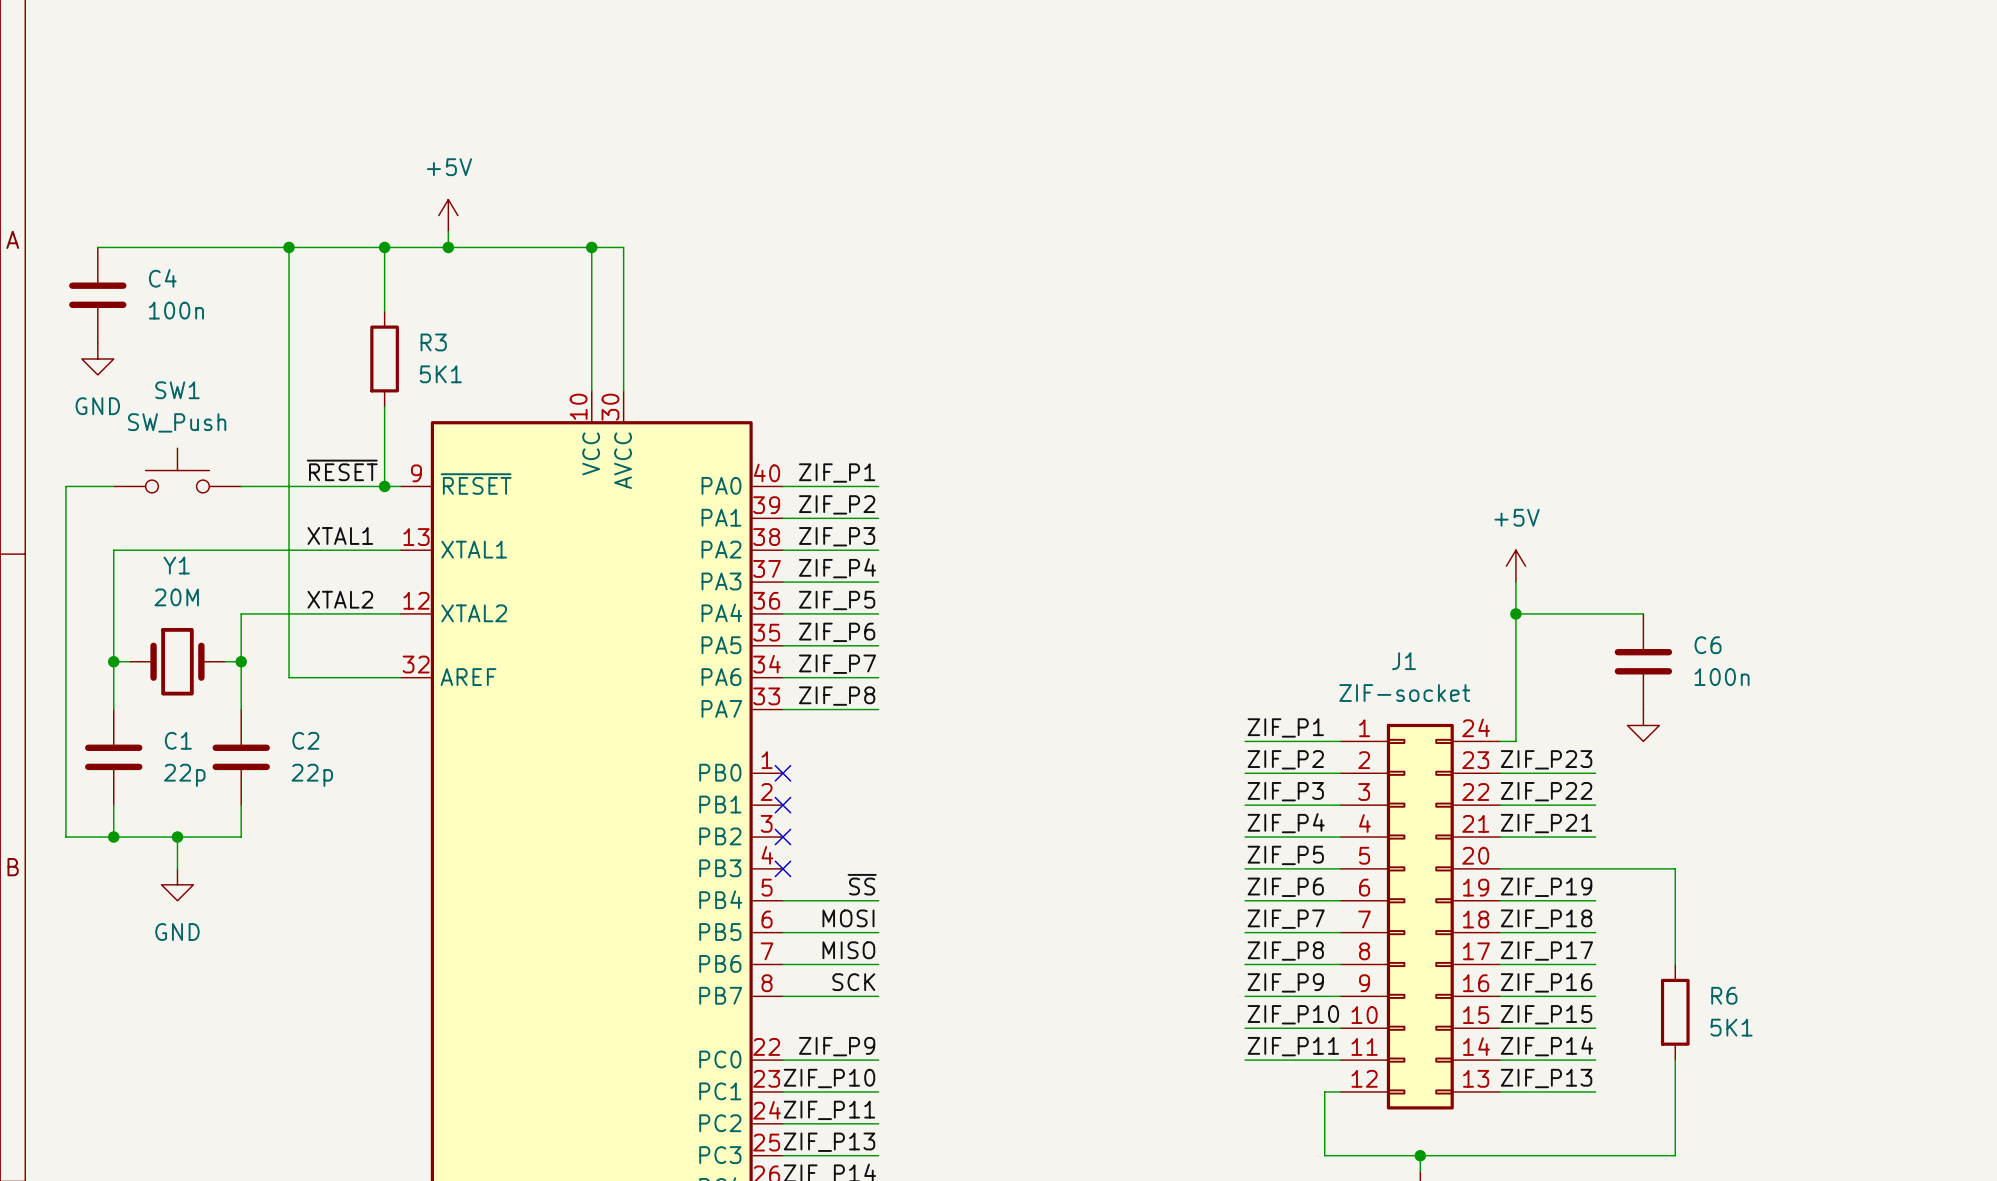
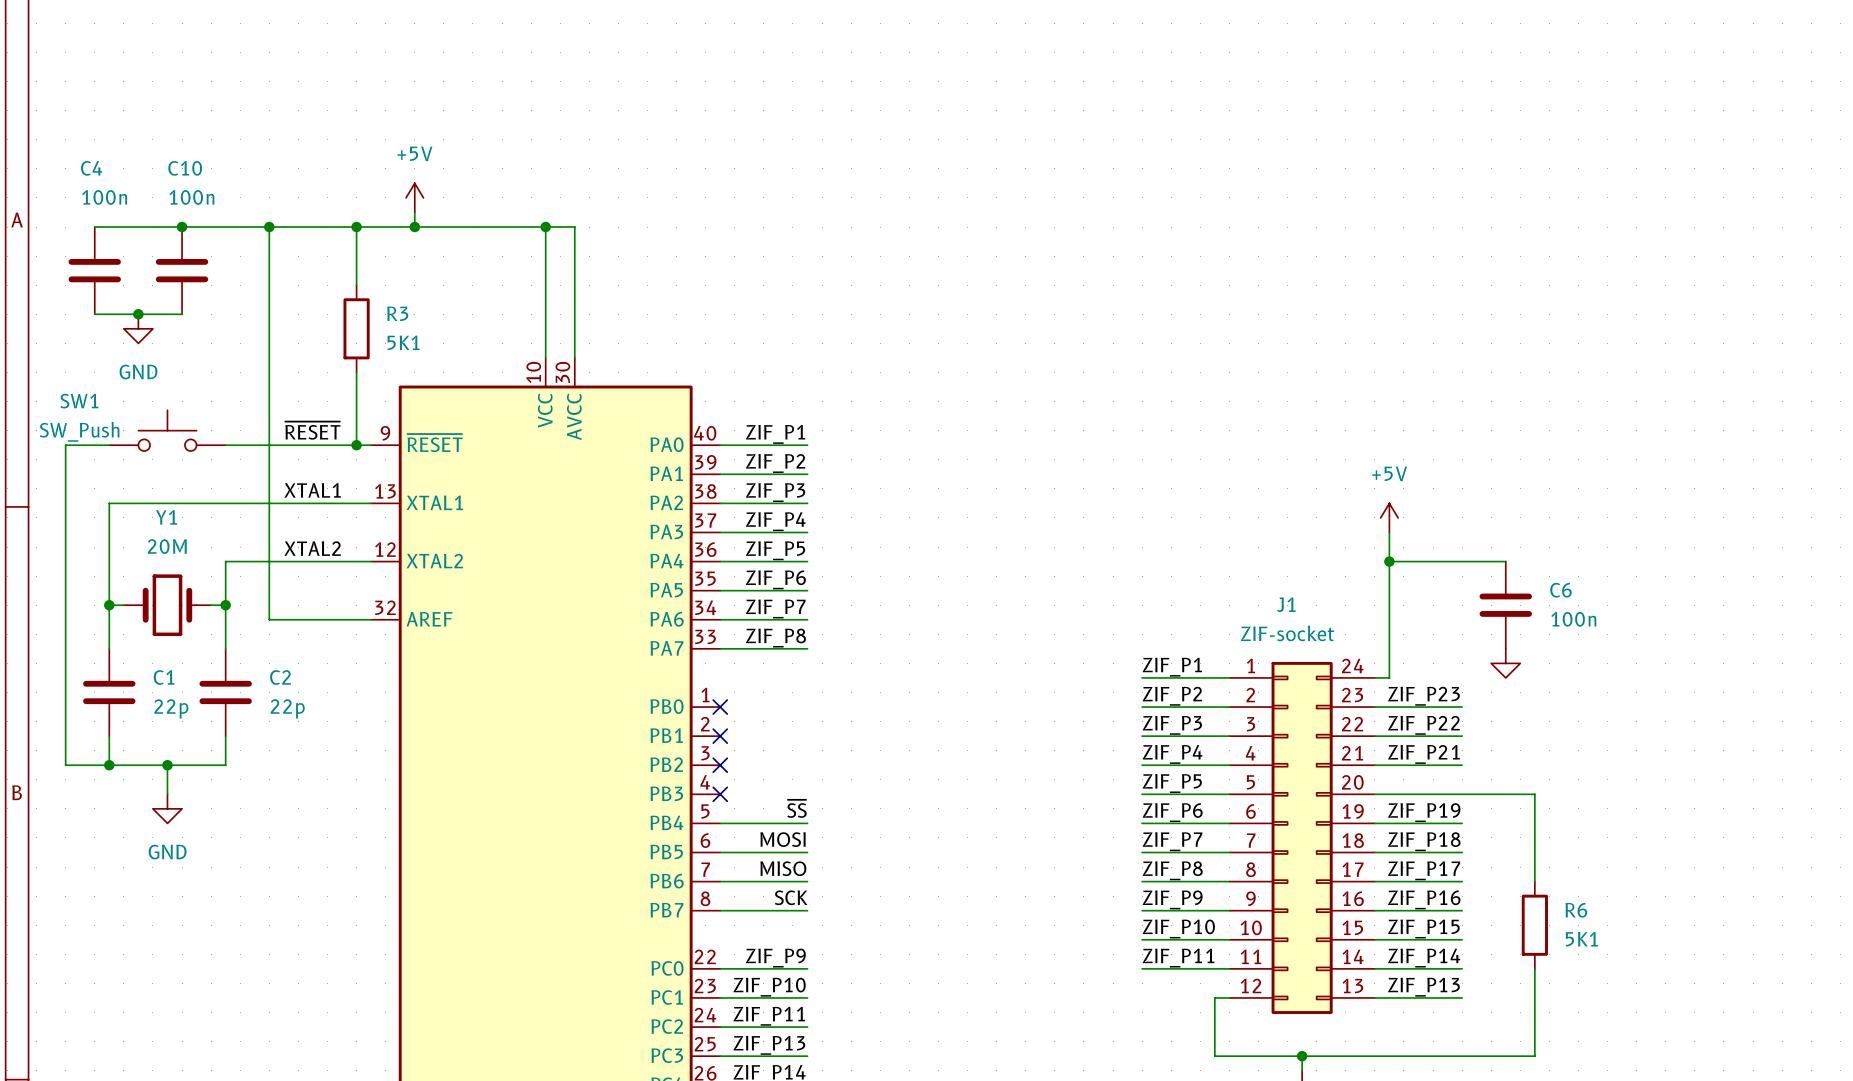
junction: none -> (182, 227)
C4 name position: C4 (162, 278) -> C4 (91, 168)
C10: none -> 100n (182, 270)
C4 value position: 100n (176, 310) -> 100n (104, 197)
wire: none -> (94, 314) (182, 314)
junction: none -> (138, 314)
power symbol position: GND (97, 358) -> GND (138, 328)
SW1 name position: SW1 (177, 390) -> SW1 (79, 401)
SW1 value position: SW_Push (177, 422) -> SW_Push (79, 431)

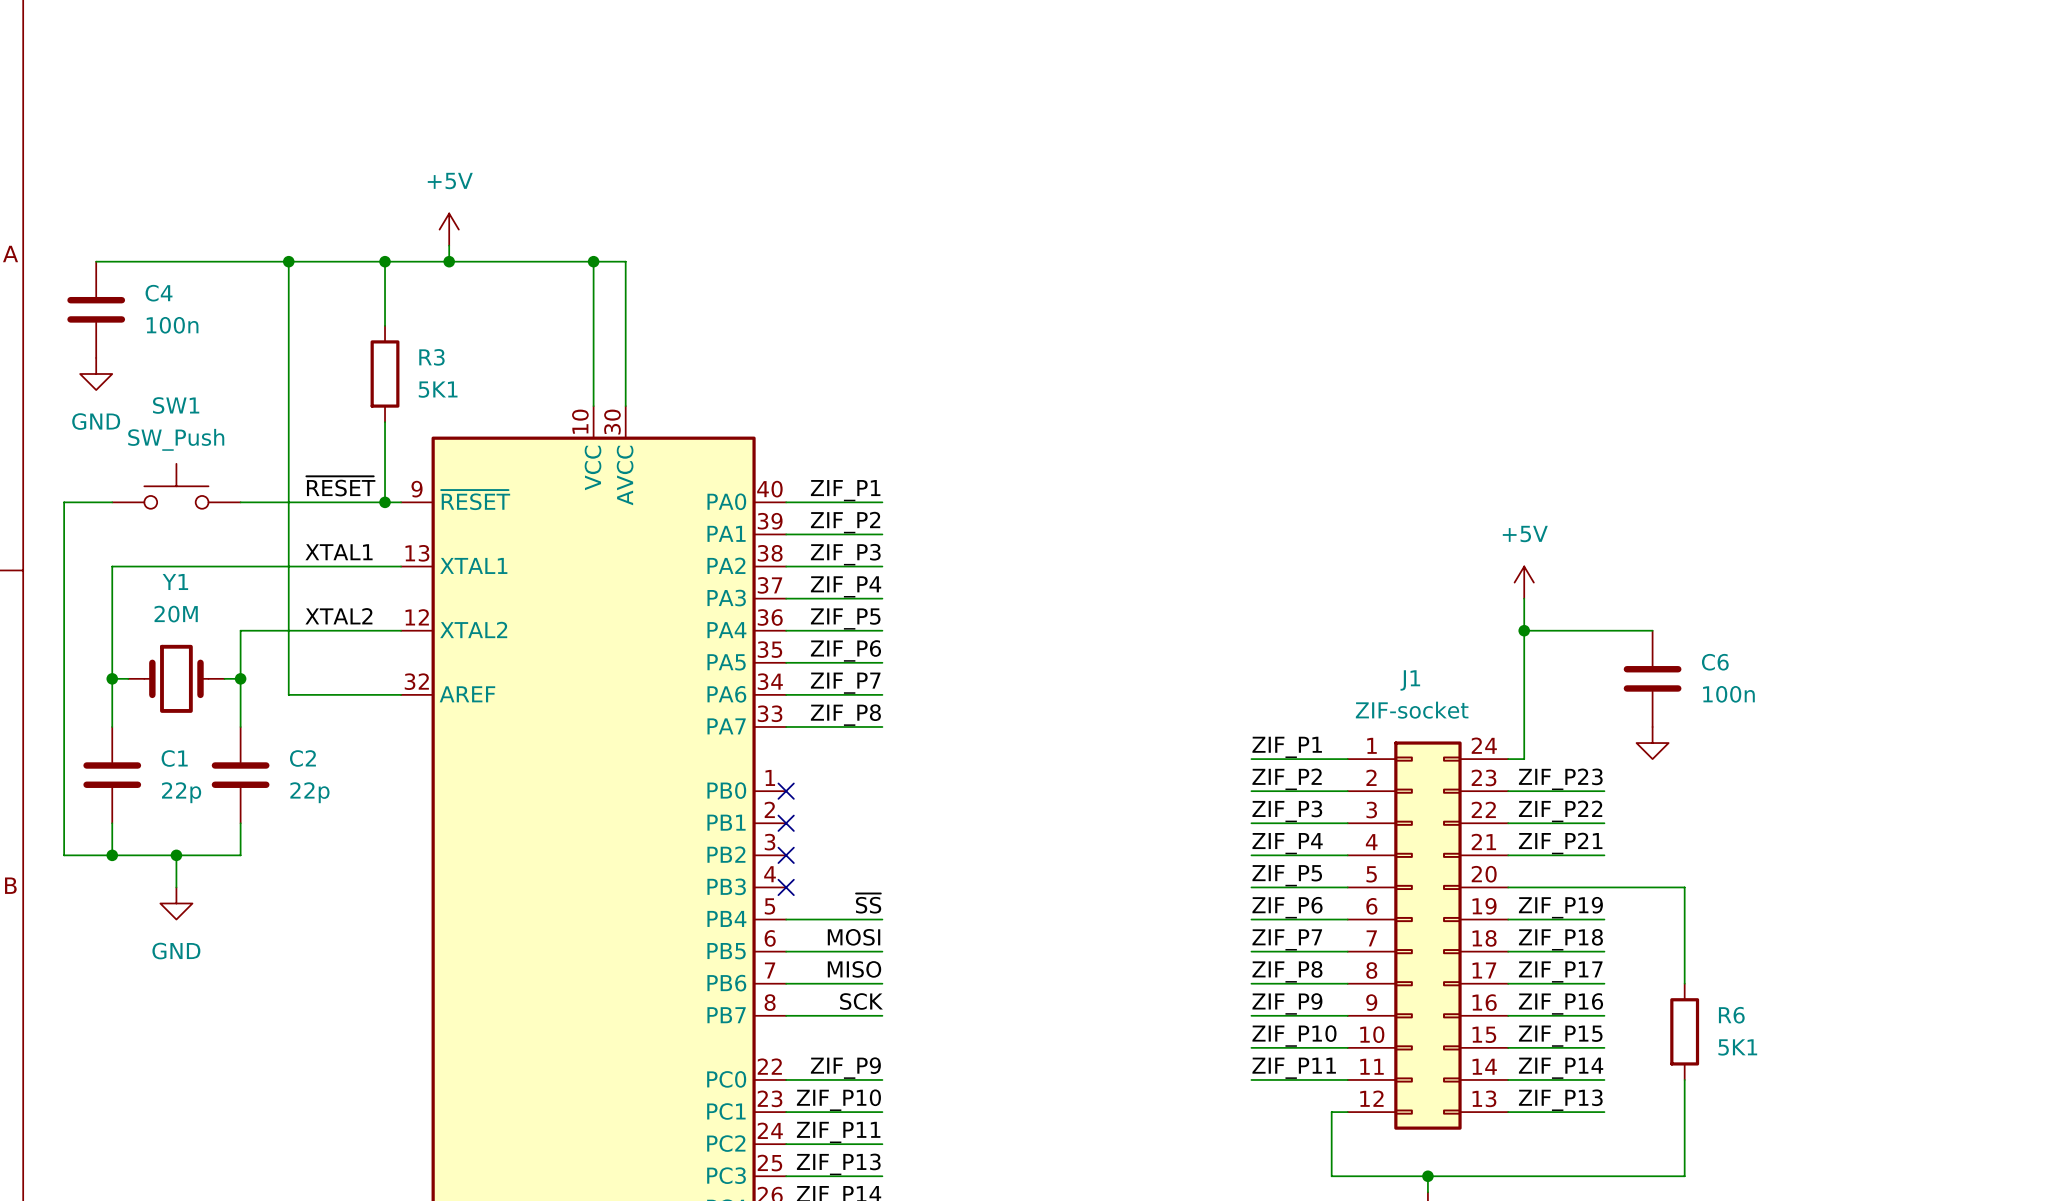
C4 name position: C4 (91, 168) -> C4 (159, 293)
C4 value position: 100n (104, 197) -> 100n (172, 325)
junction: (182, 227) -> none
C10: 100n (182, 270) -> none
wire: (94, 314) (182, 314) -> none
junction: (138, 314) -> none
power symbol position: GND (138, 328) -> GND (96, 374)
SW1 name position: SW1 (79, 401) -> SW1 (176, 405)
SW1 value position: SW_Push (79, 431) -> SW_Push (176, 439)

